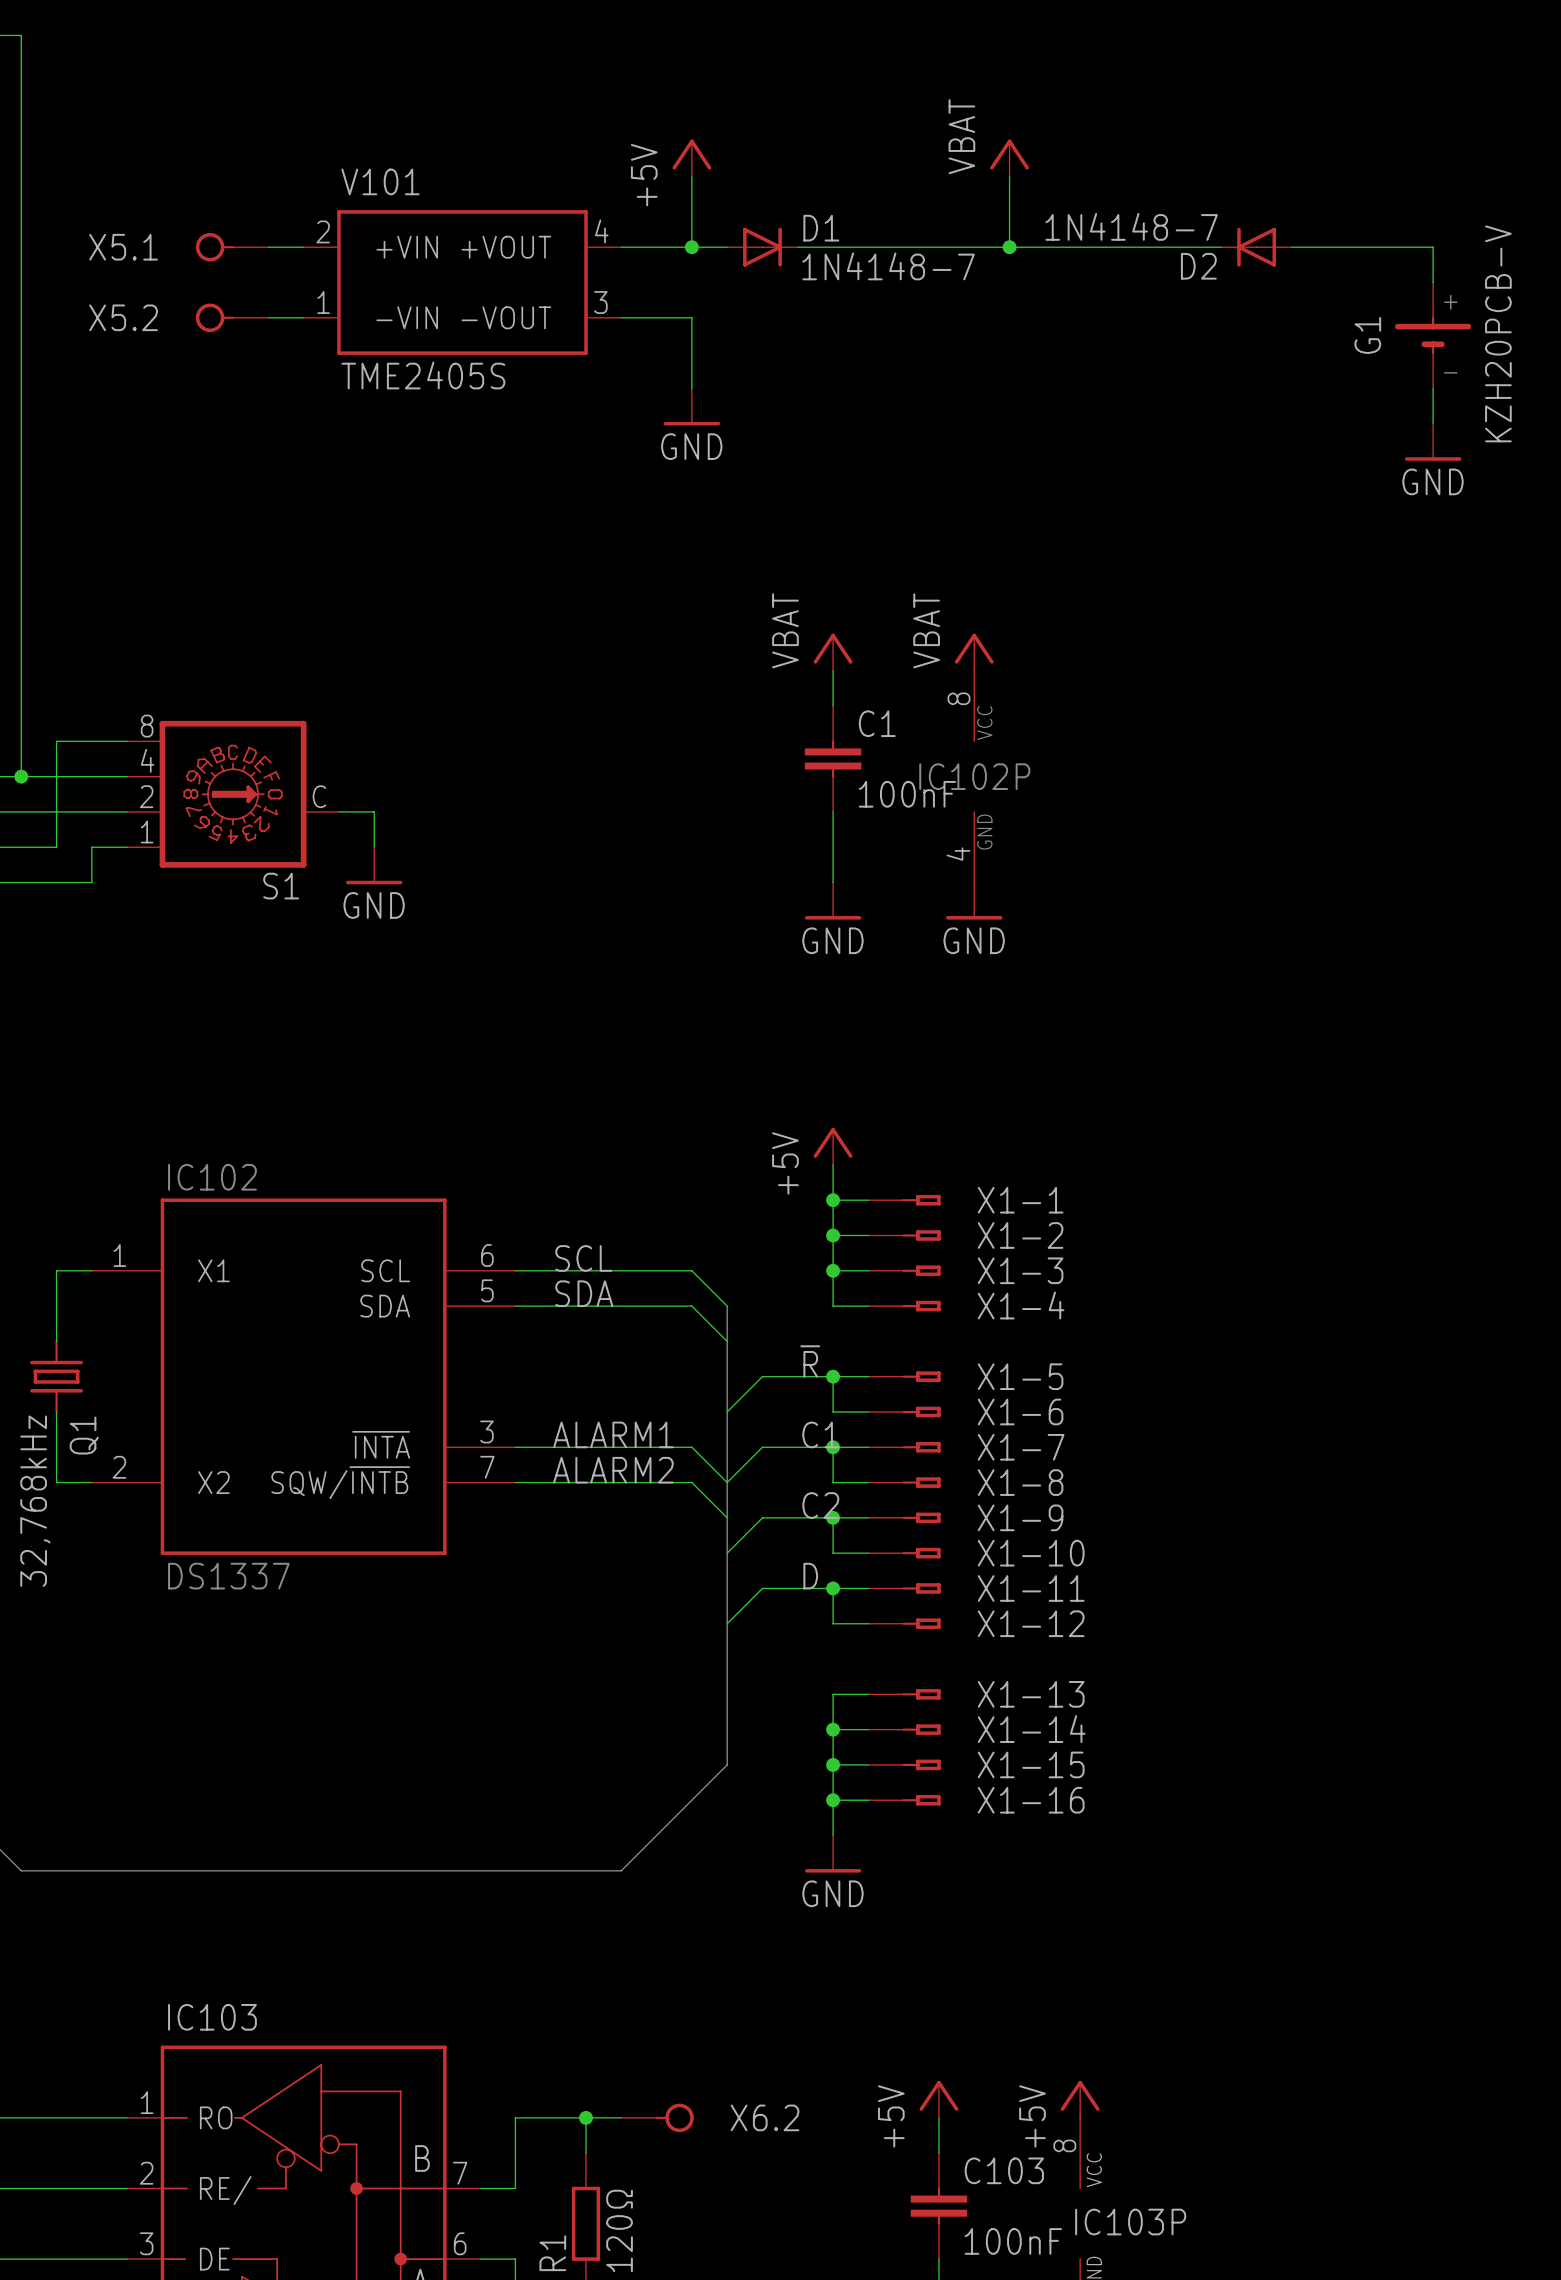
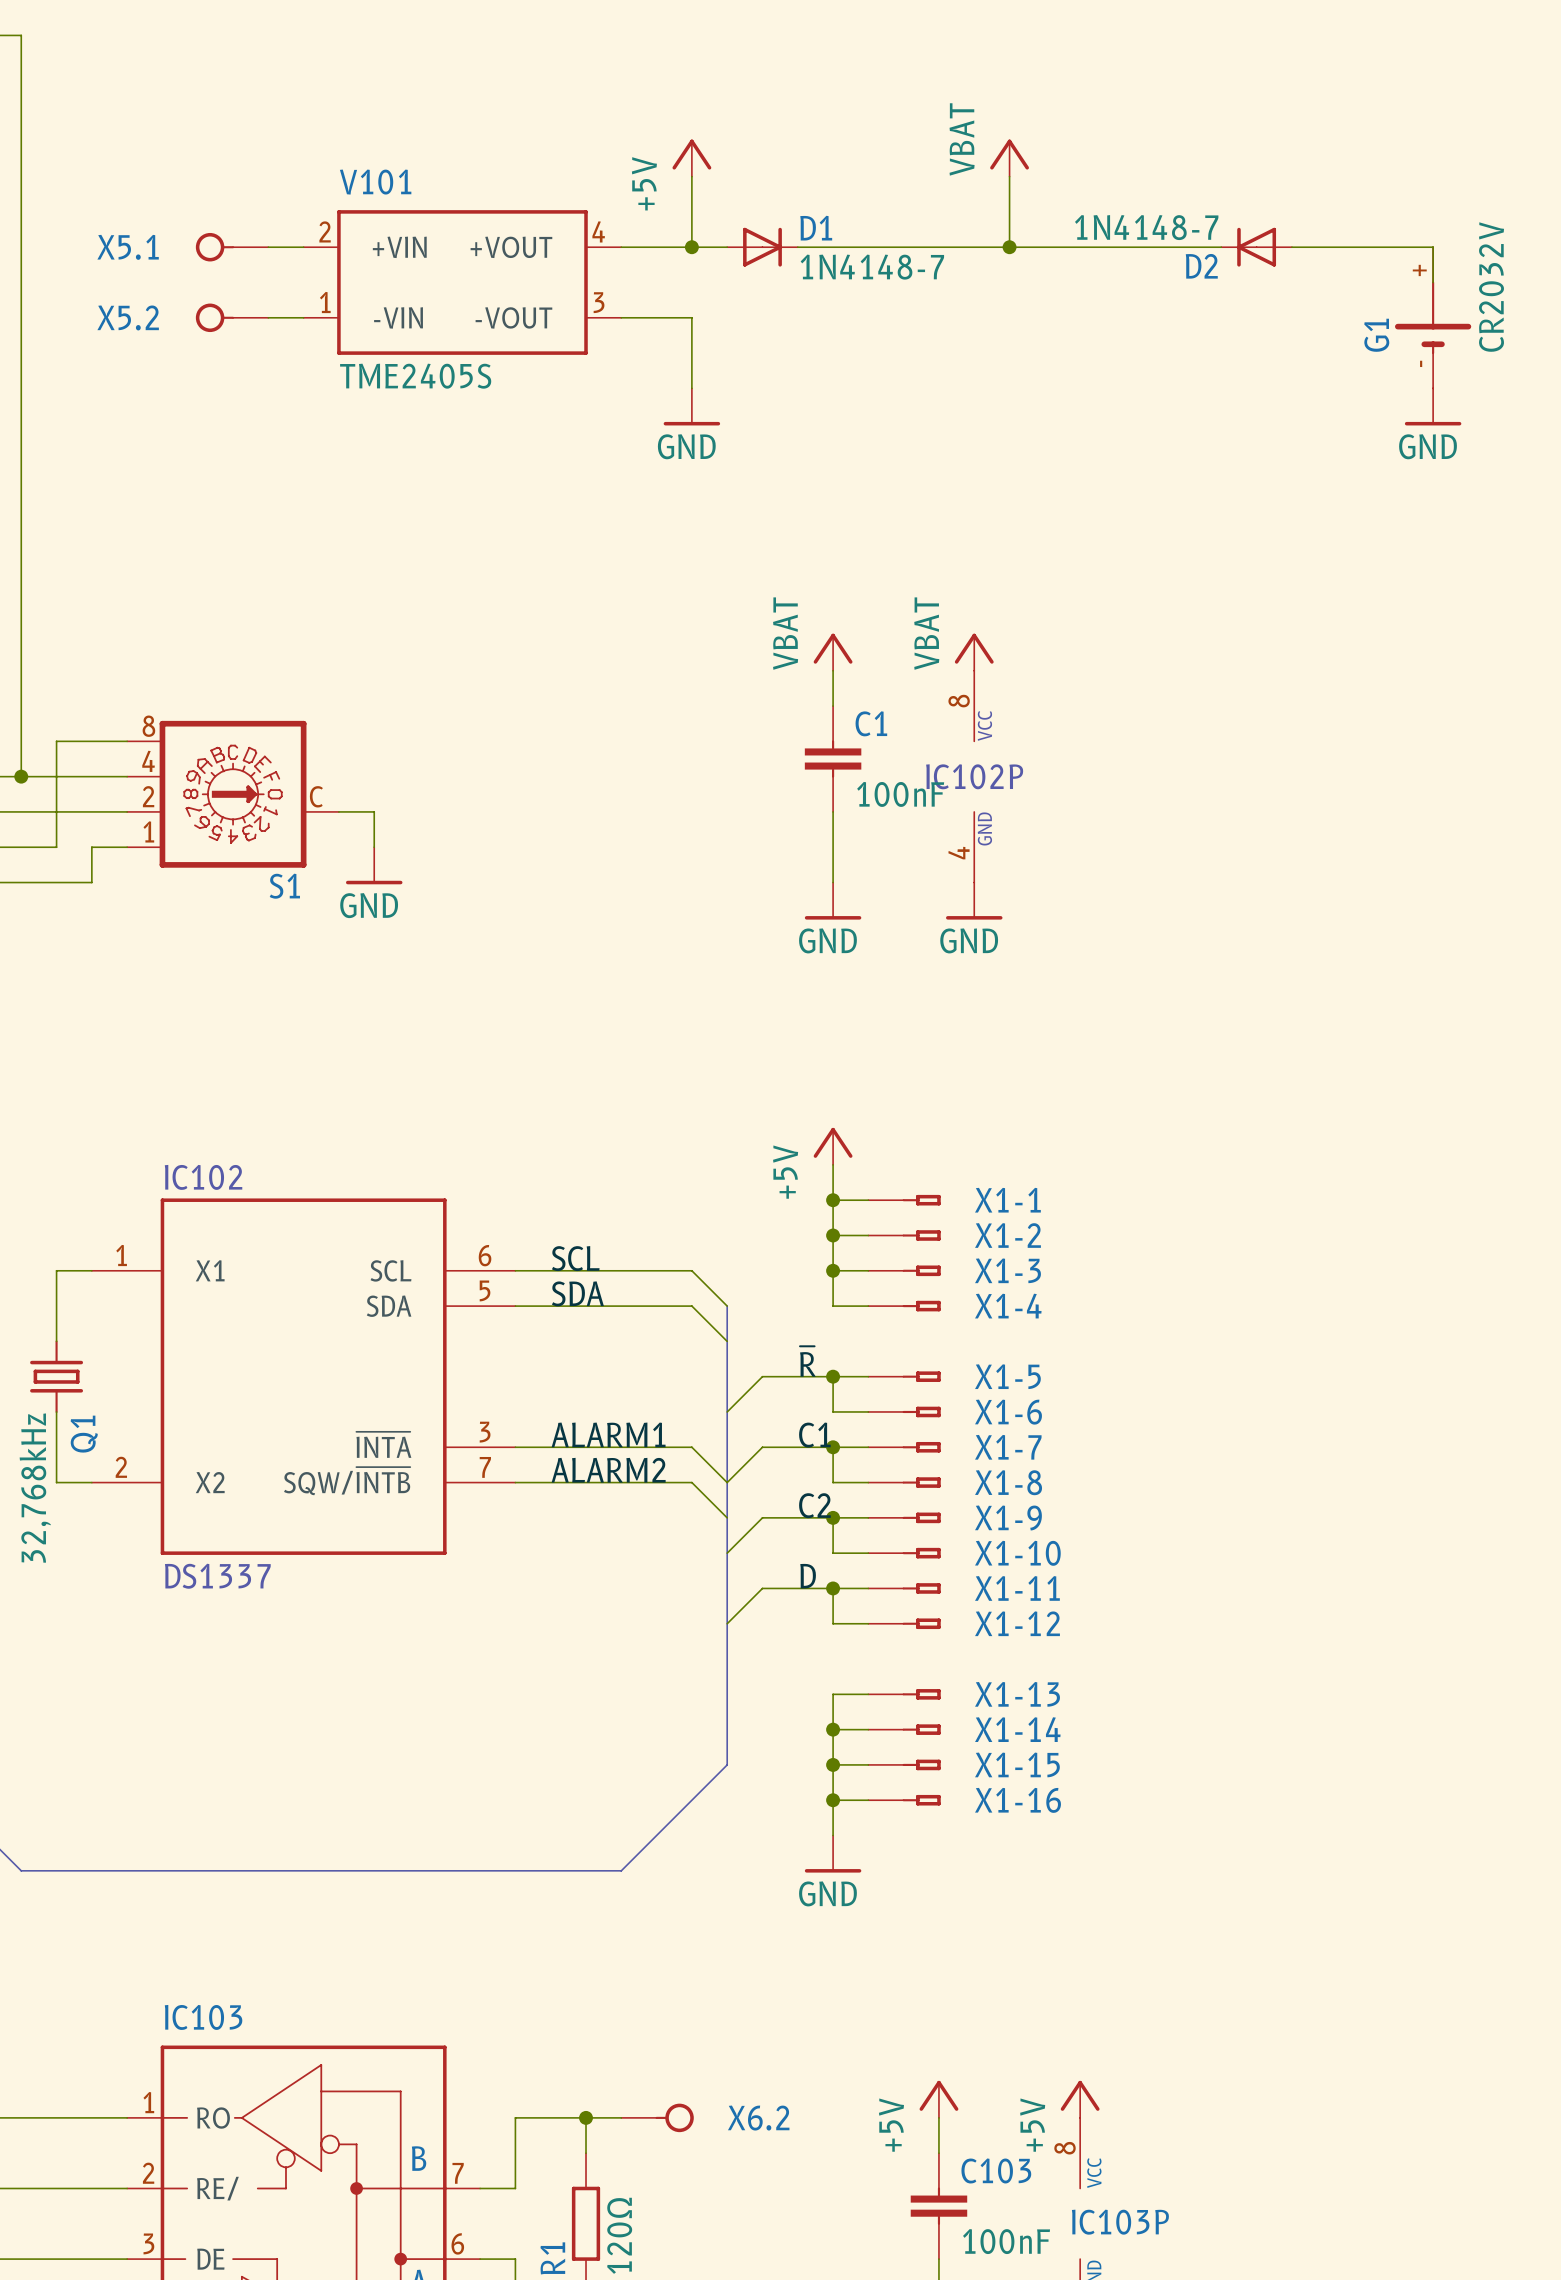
G1 symbol: [1394, 282, 1472, 389] -> [1394, 247, 1472, 389]
G1 value: KZH20PCB-V (1498, 333) -> CR2032V (1491, 287)
power symbol position: GND (1433, 442) -> GND (1433, 406)

